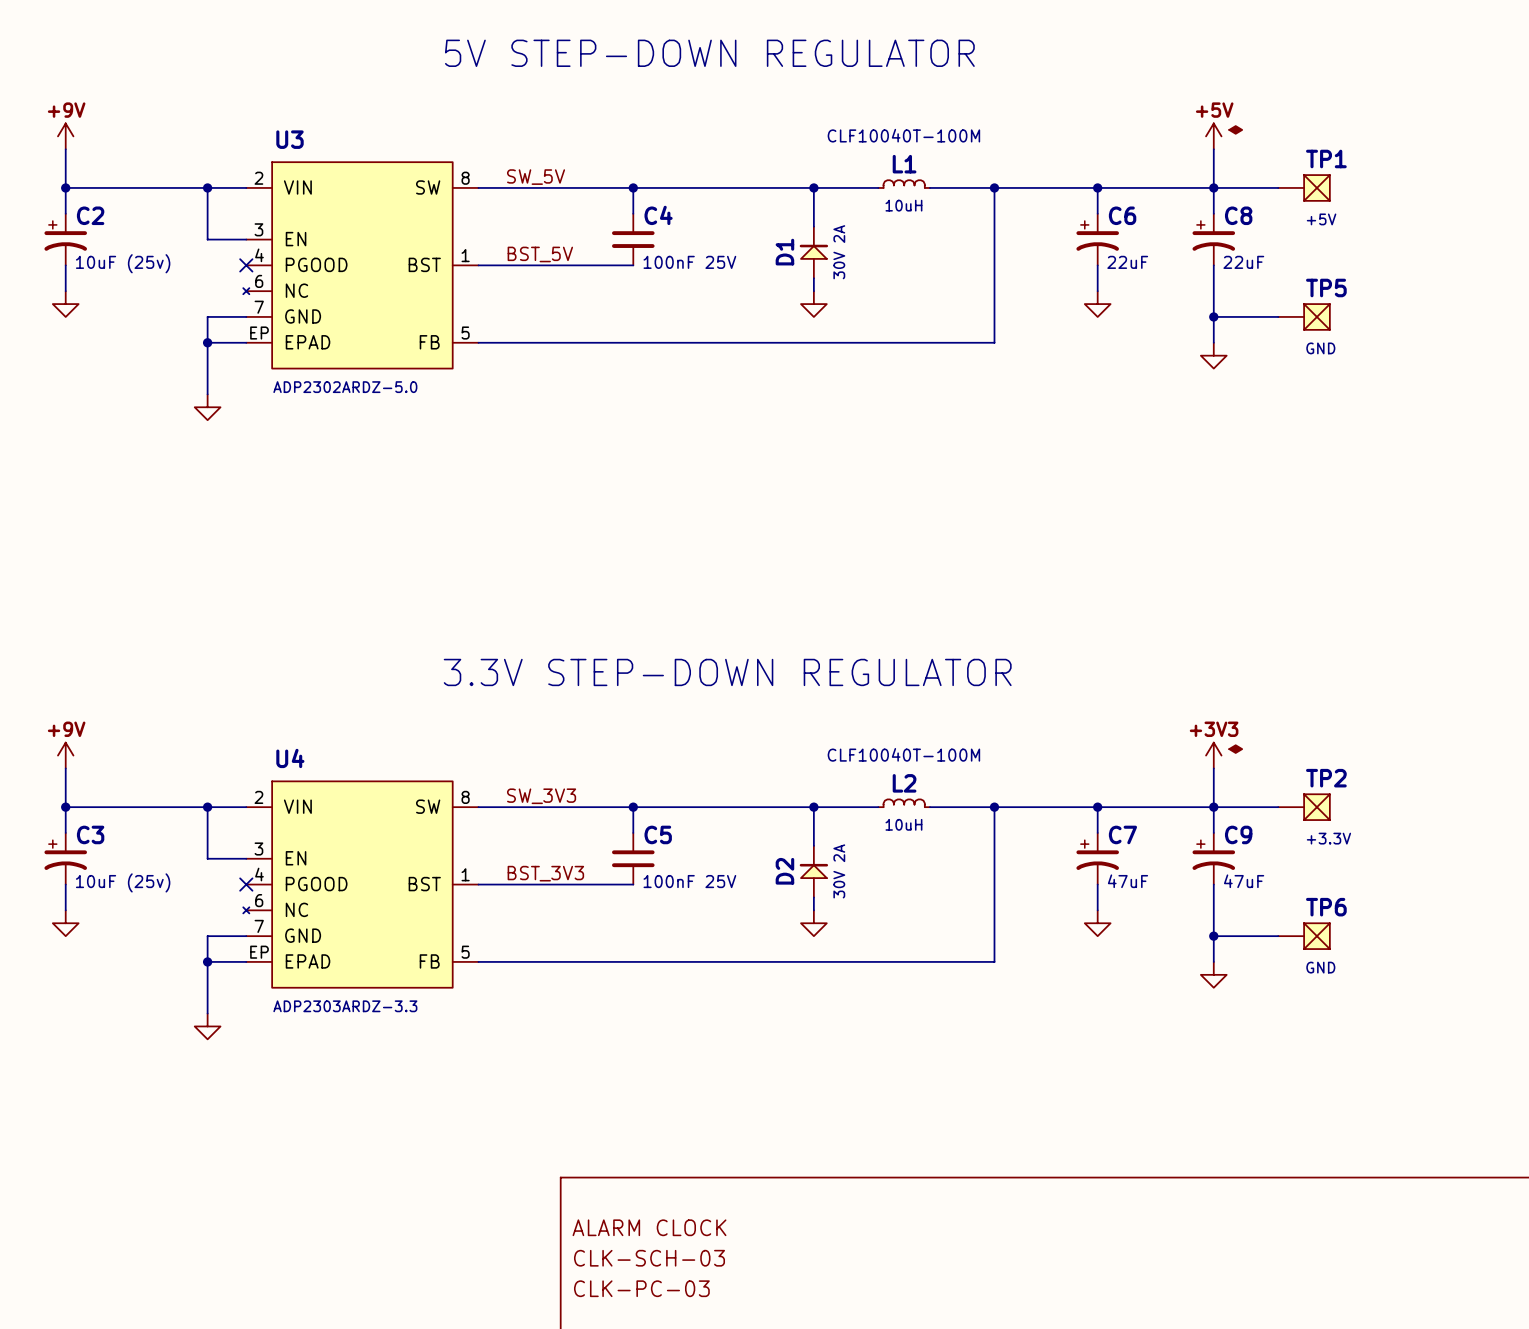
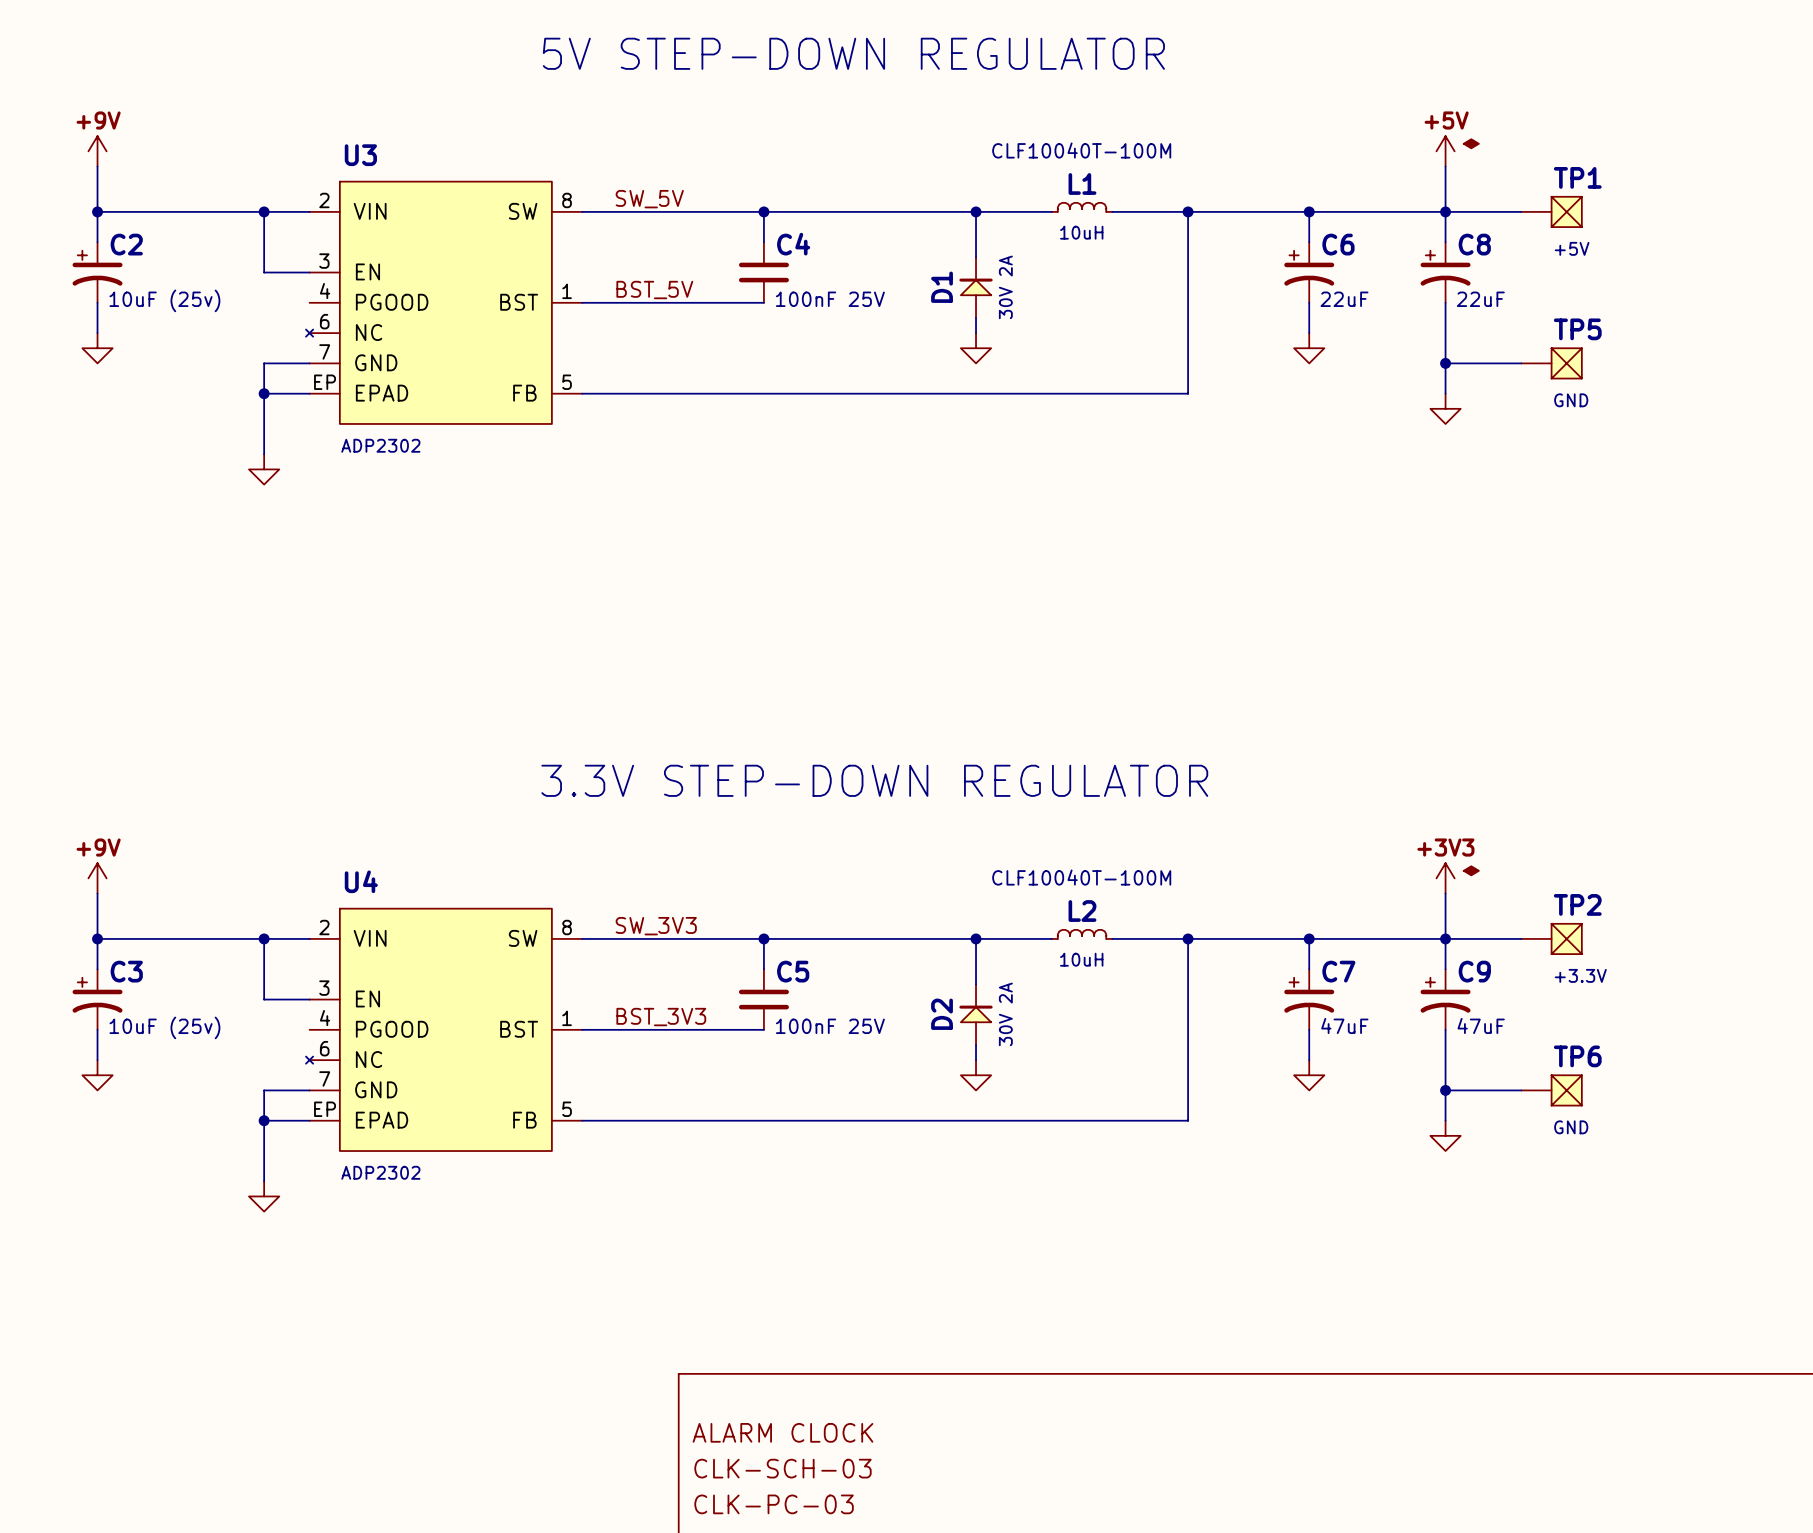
no-connect mark: (246, 265) -> none
U3 value: ADP2302ARDZ-5.0 (345, 387) -> ADP2302 (380, 445)
no-connect mark: (246, 884) -> none
U4 value: ADP2303ARDZ-3.3 (345, 1006) -> ADP2302 (380, 1172)

